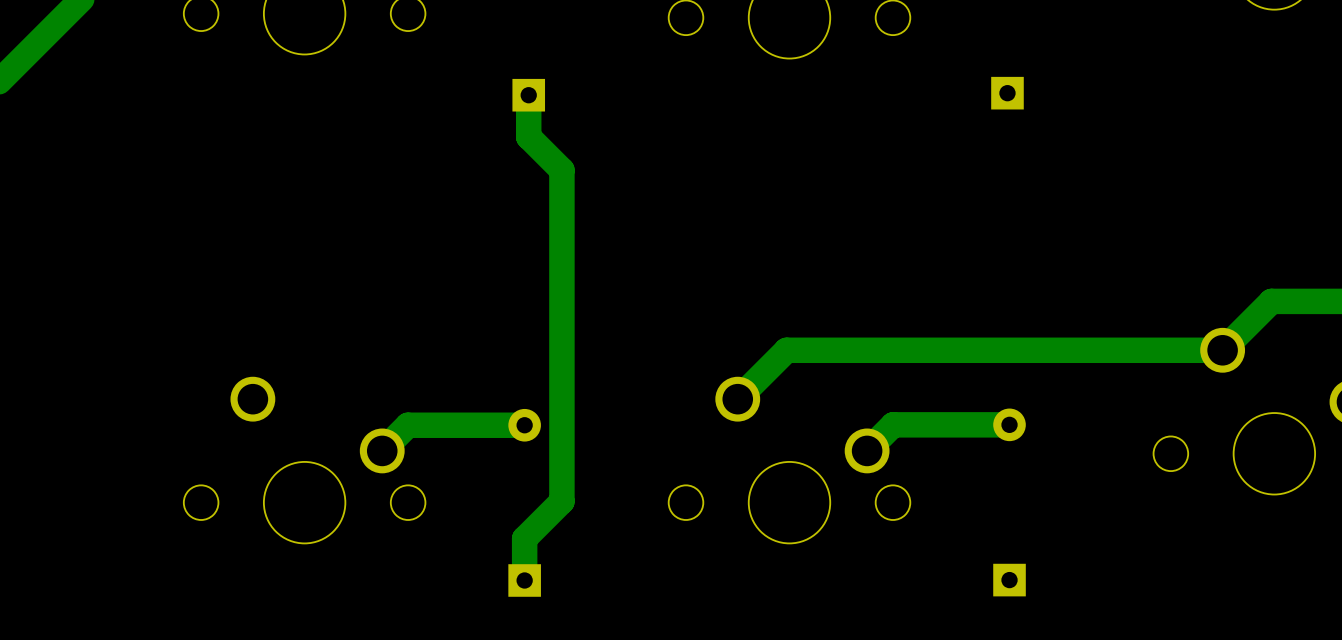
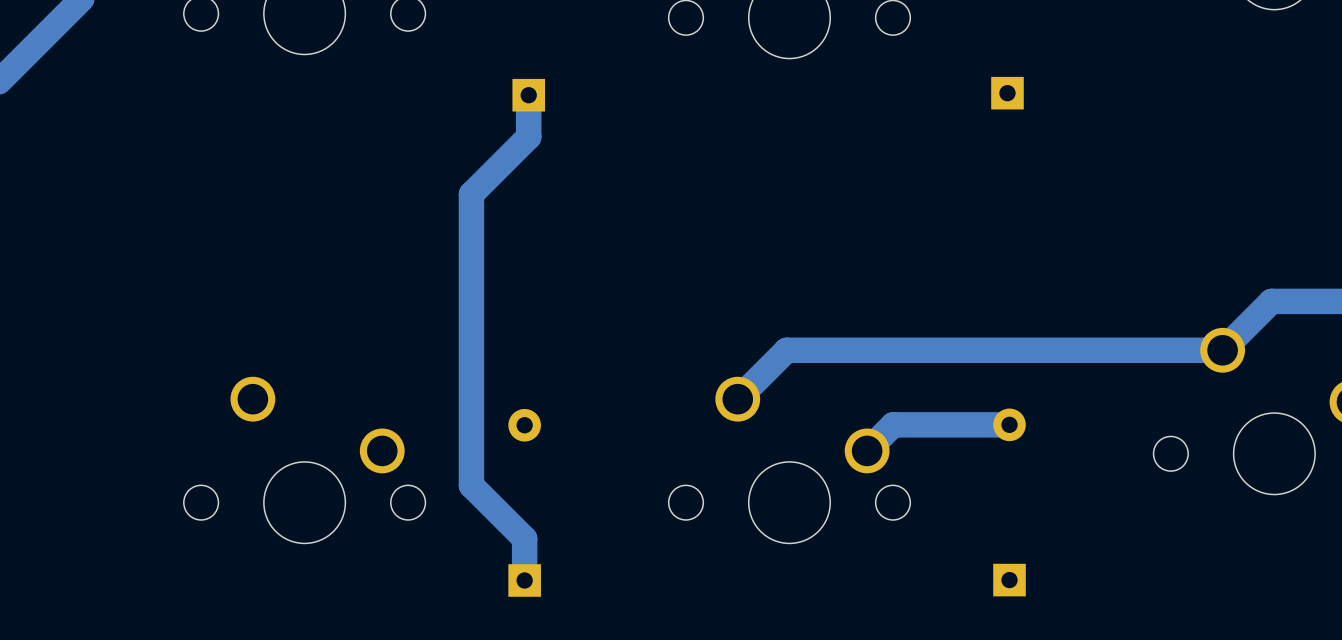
track: (528, 136) (561, 170) (561, 501) (524, 538) -> (528, 136) (471, 194) (471, 485) (524, 538)
track: (524, 425) (407, 425) (382, 450) -> none

